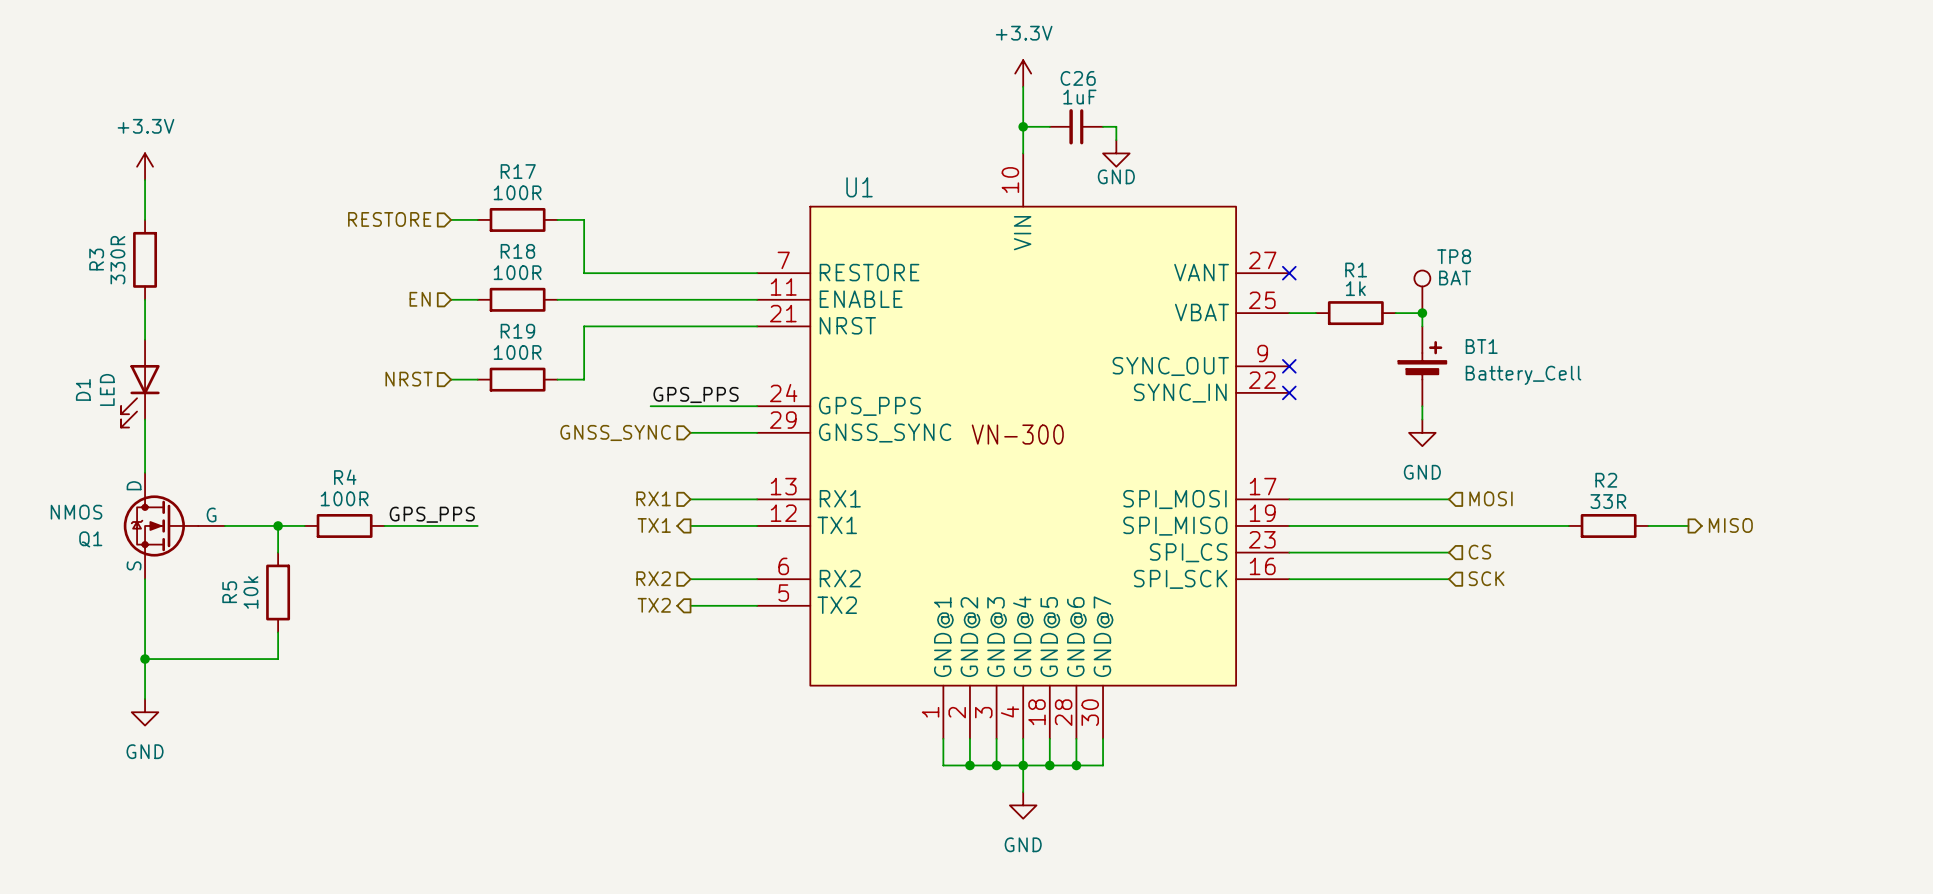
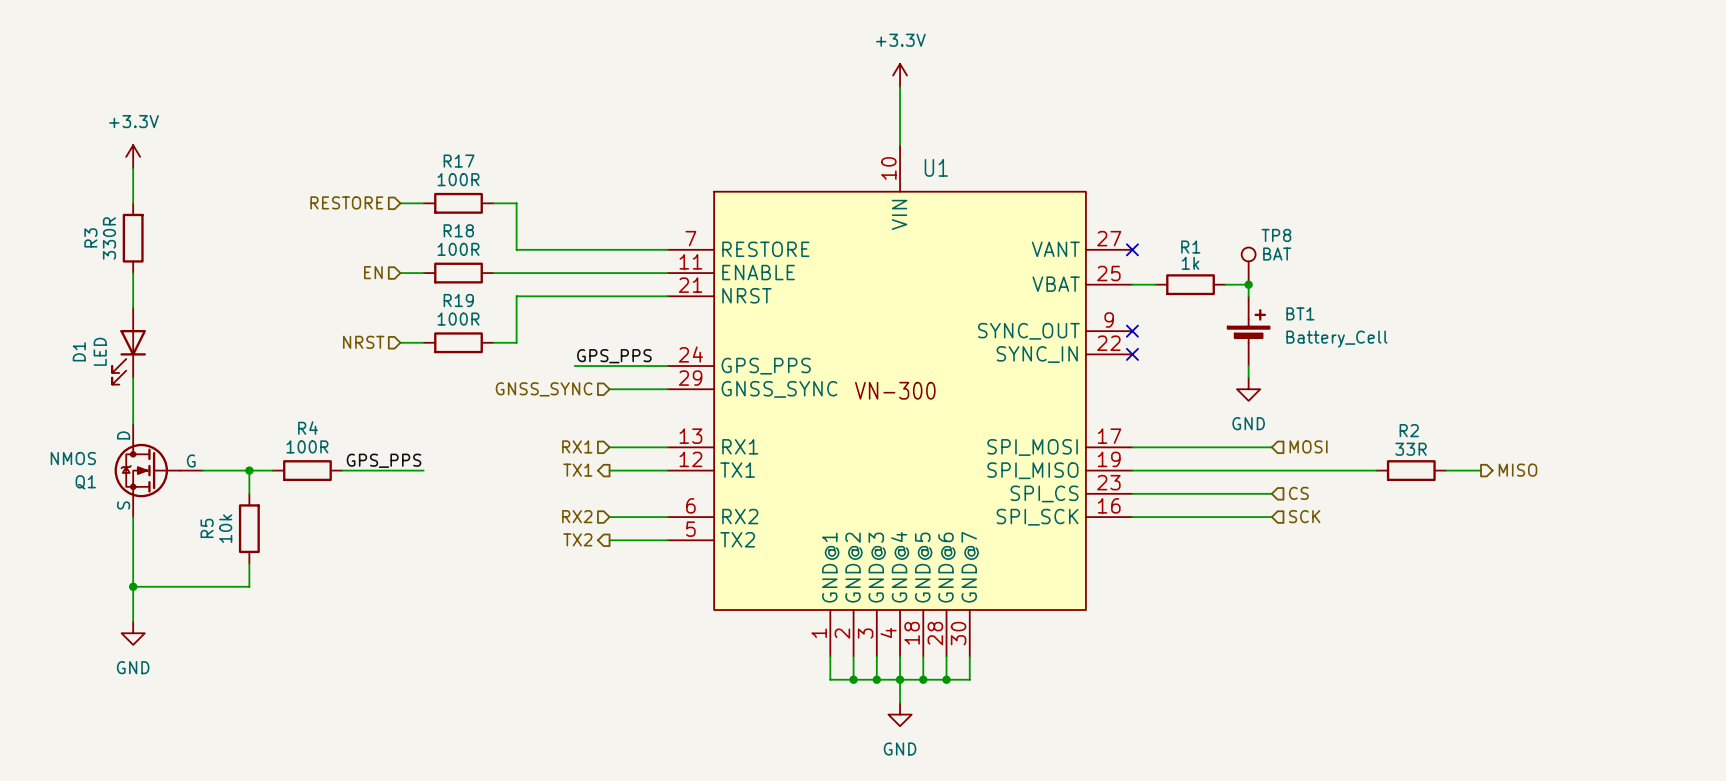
wire: (1023, 126) (1049, 126) -> none
junction: (1023, 126) -> none
C26: 1uF (1076, 126) -> none
wire: (1103, 126) (1116, 126) (1116, 140) -> none
power symbol: GND (1116, 153) -> none
U1 name position: U1 (859, 187) -> U1 (936, 167)

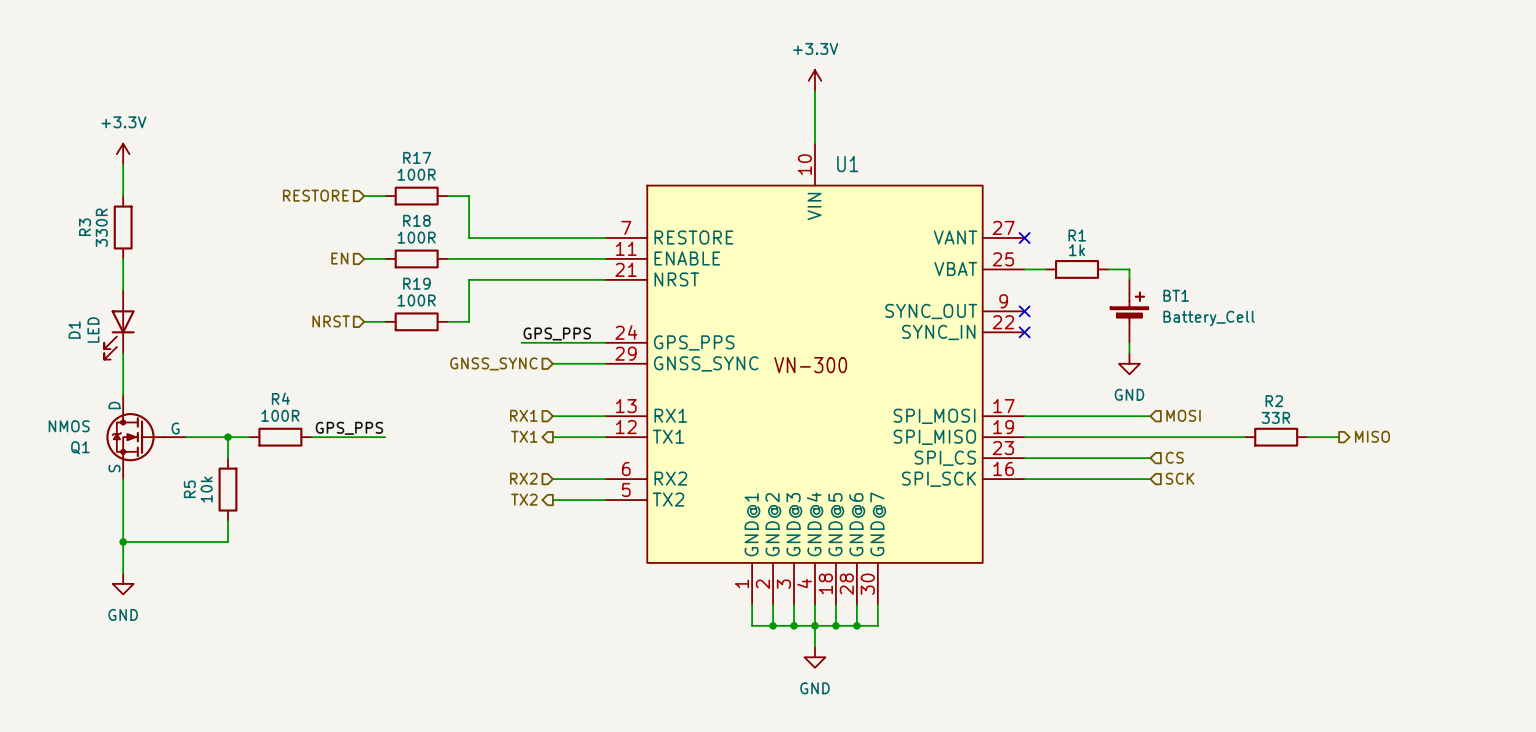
TP8: BAT (1248, 266) -> none
junction: (1248, 284) -> none

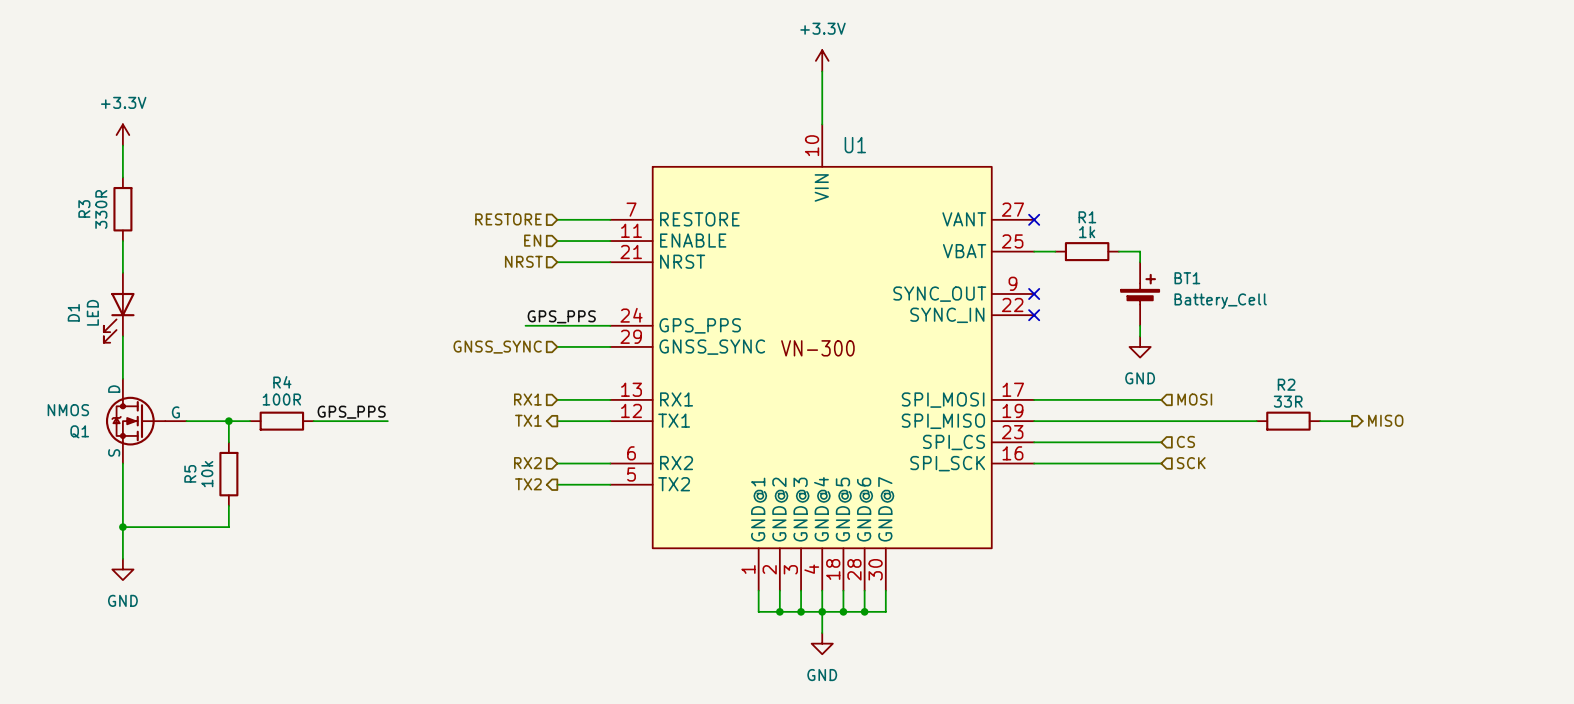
hierarchical label position: RESTORE (315, 195) -> RESTORE (508, 219)
wire: (364, 196) (385, 196) -> none
R17: 100R (416, 196) -> none
wire: (448, 196) (469, 196) (469, 238) (552, 238) -> none
hierarchical label position: EN (339, 258) -> EN (532, 240)
wire: (364, 258) (385, 258) -> none
R18: 100R (416, 258) -> none
wire: (448, 258) (552, 258) -> none
wire: (552, 279) (469, 279) (469, 321) (448, 321) -> none
hierarchical label position: NRST (331, 321) -> NRST (523, 261)
wire: (364, 321) (385, 321) -> none
R19: 100R (416, 321) -> none

